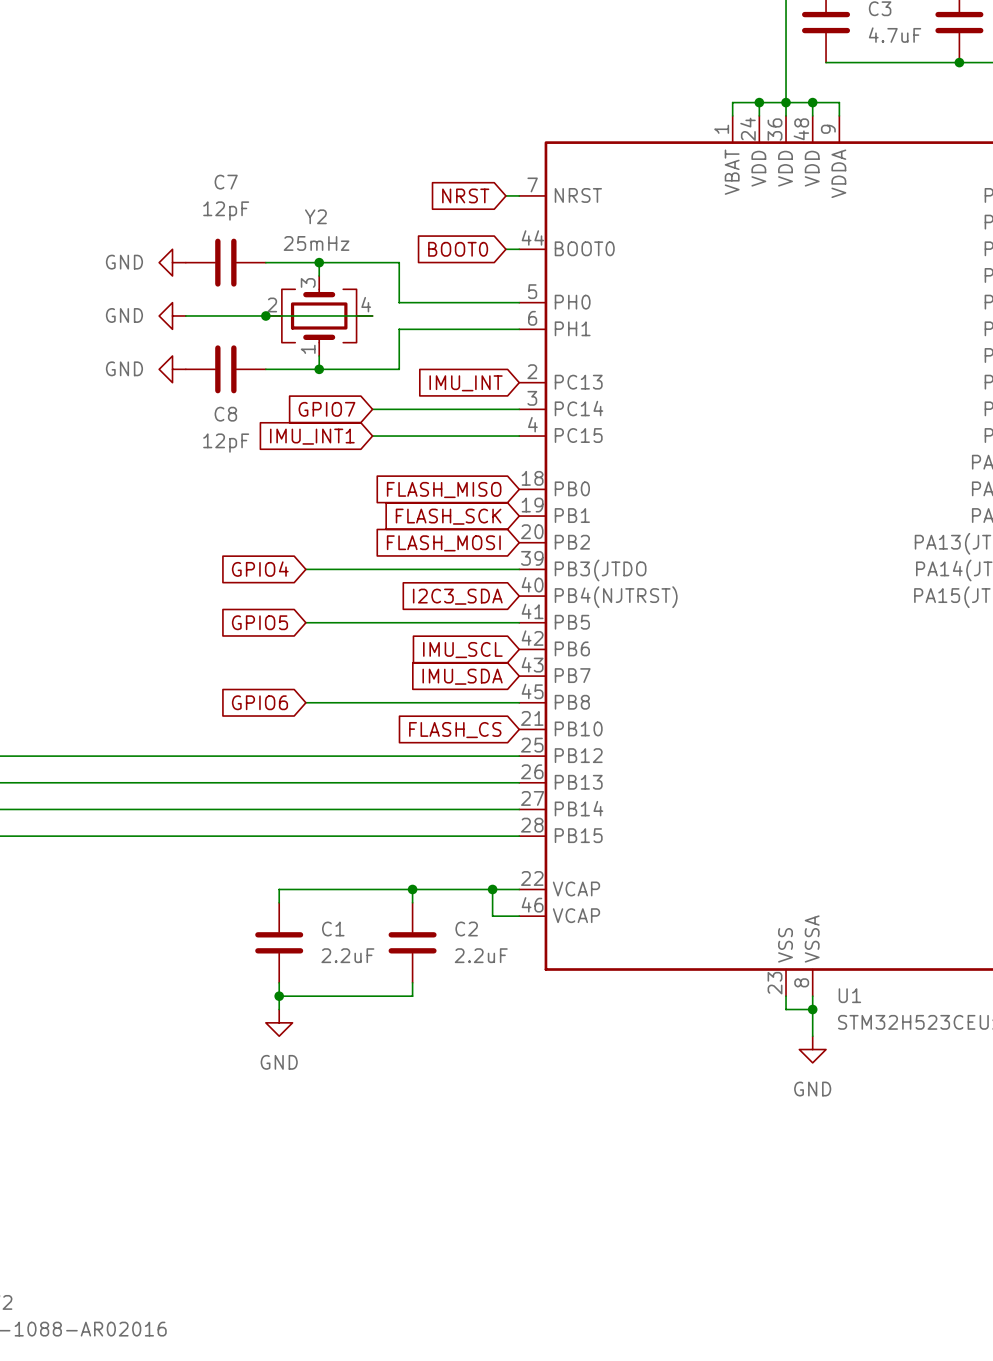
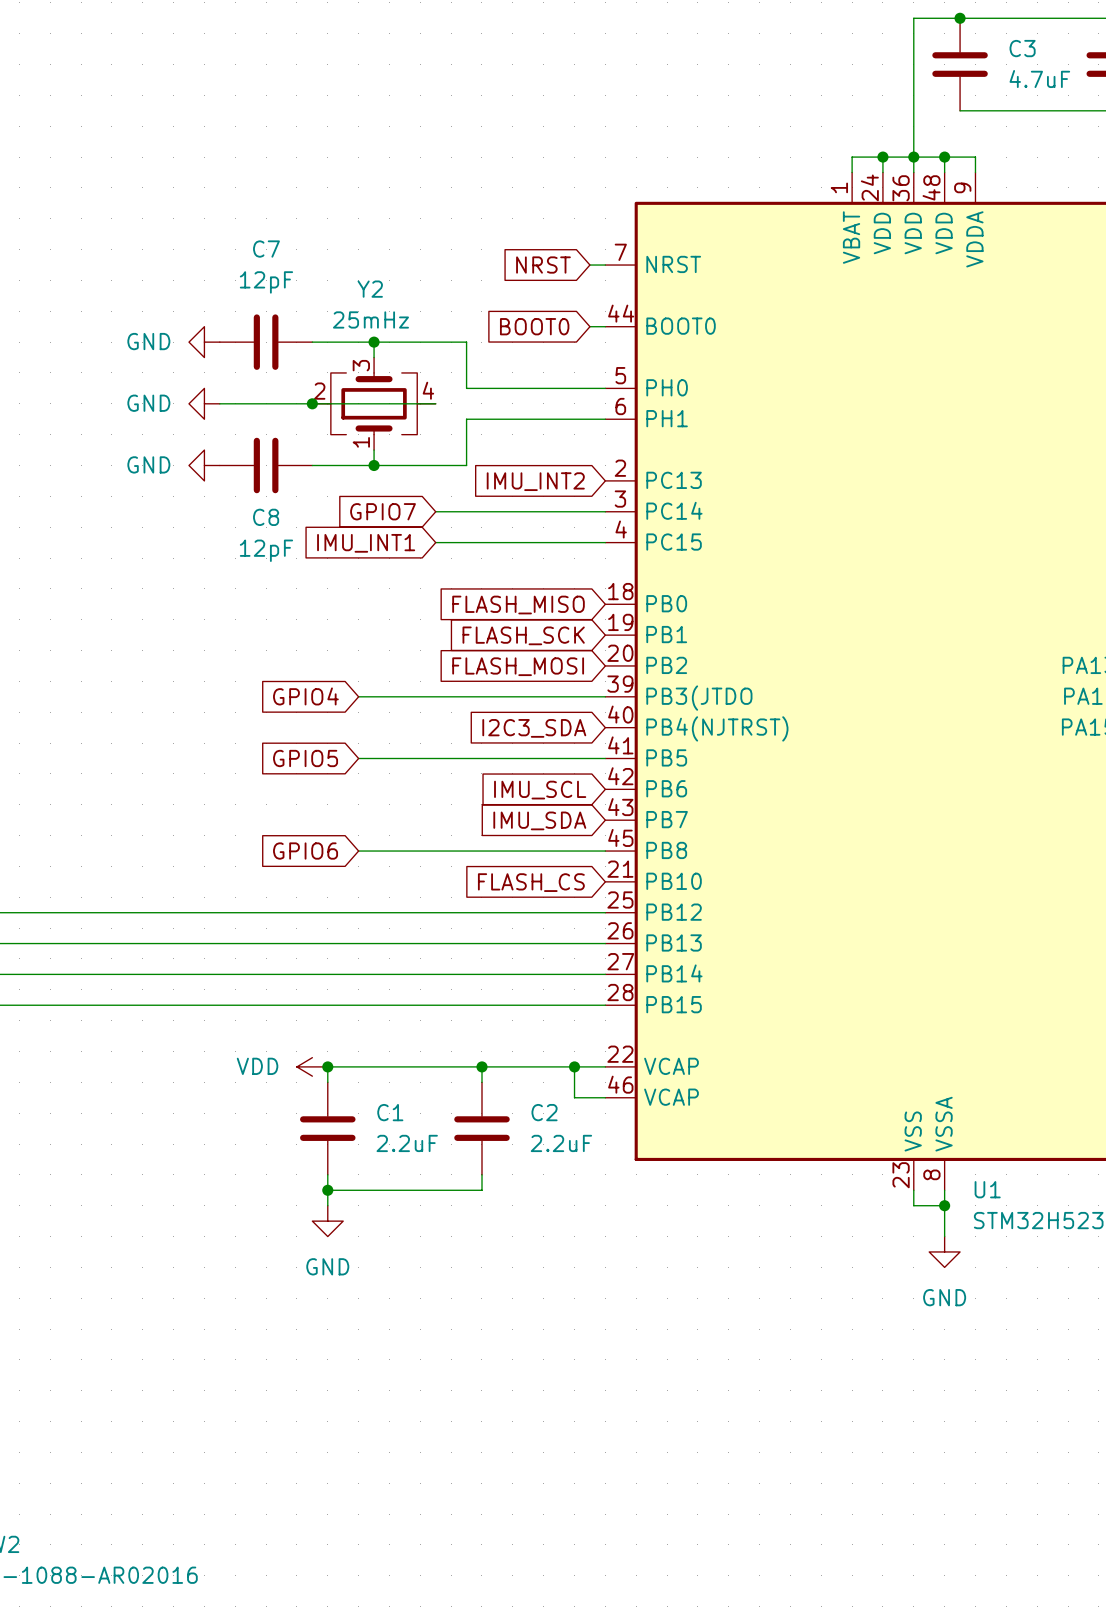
global label: IMU_INT (466, 383) -> IMU_INT2 (535, 481)
power symbol: none -> VDD (312, 1066)
junction: none -> (327, 1066)

